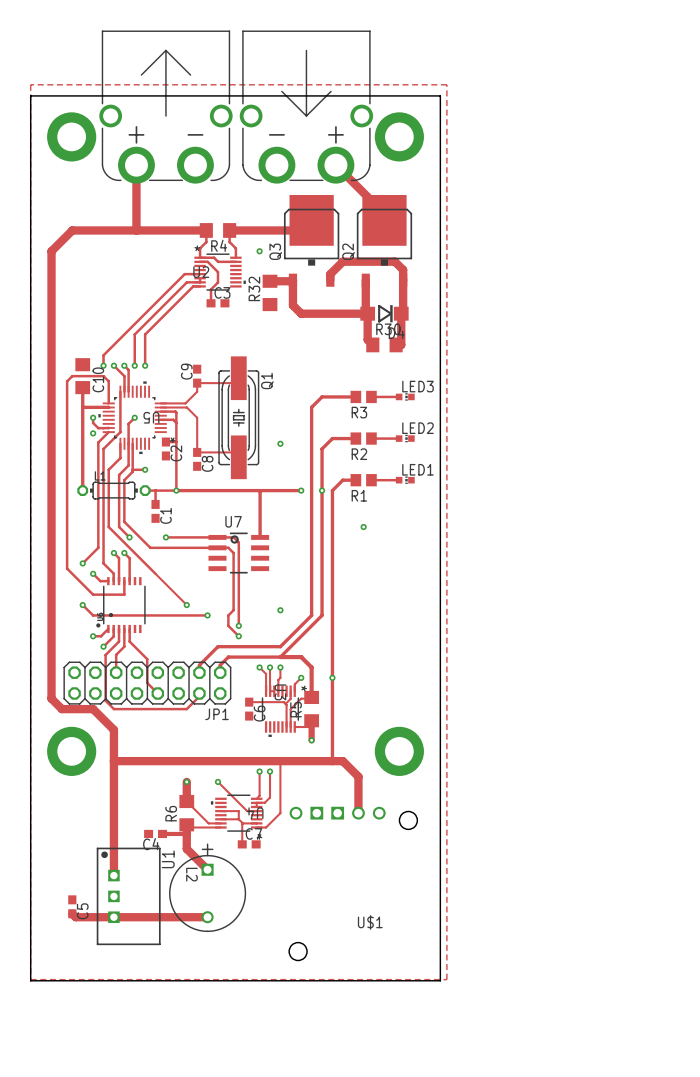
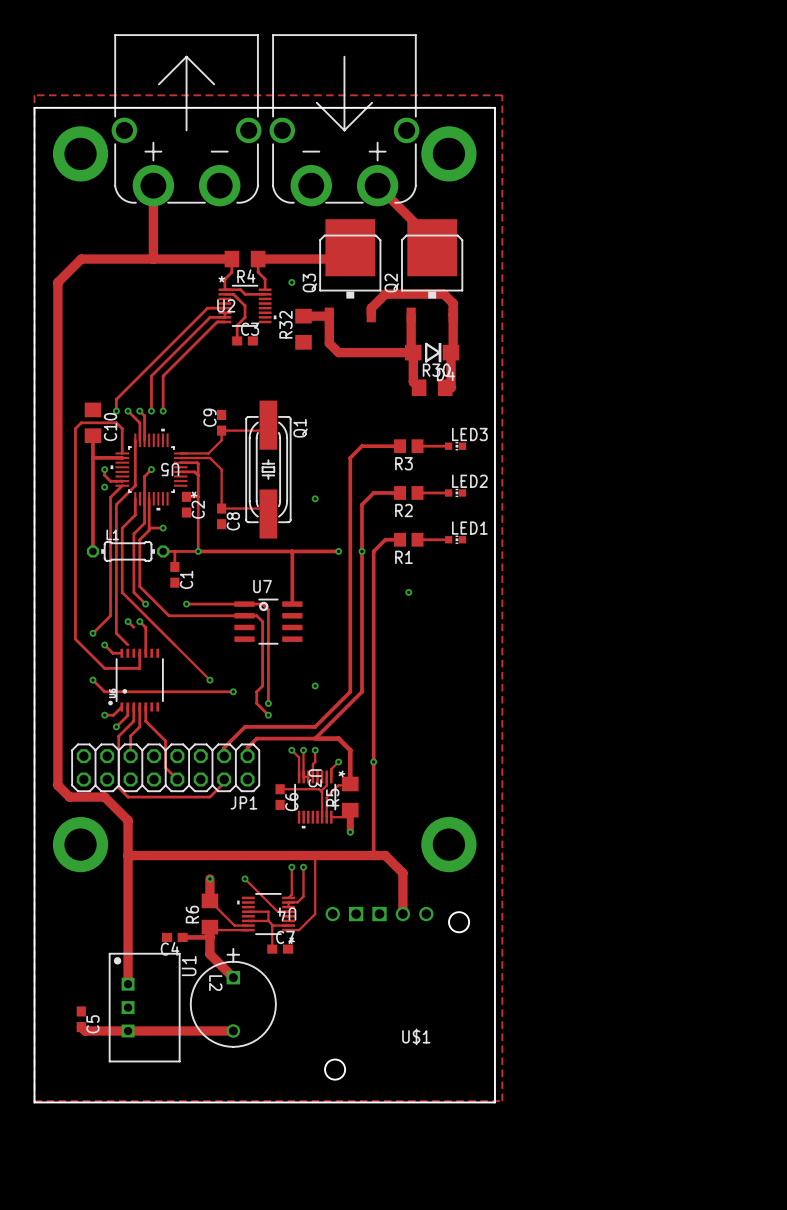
track: (119, 558) (119, 581) -> none
track: (113, 573) (113, 581) -> none

